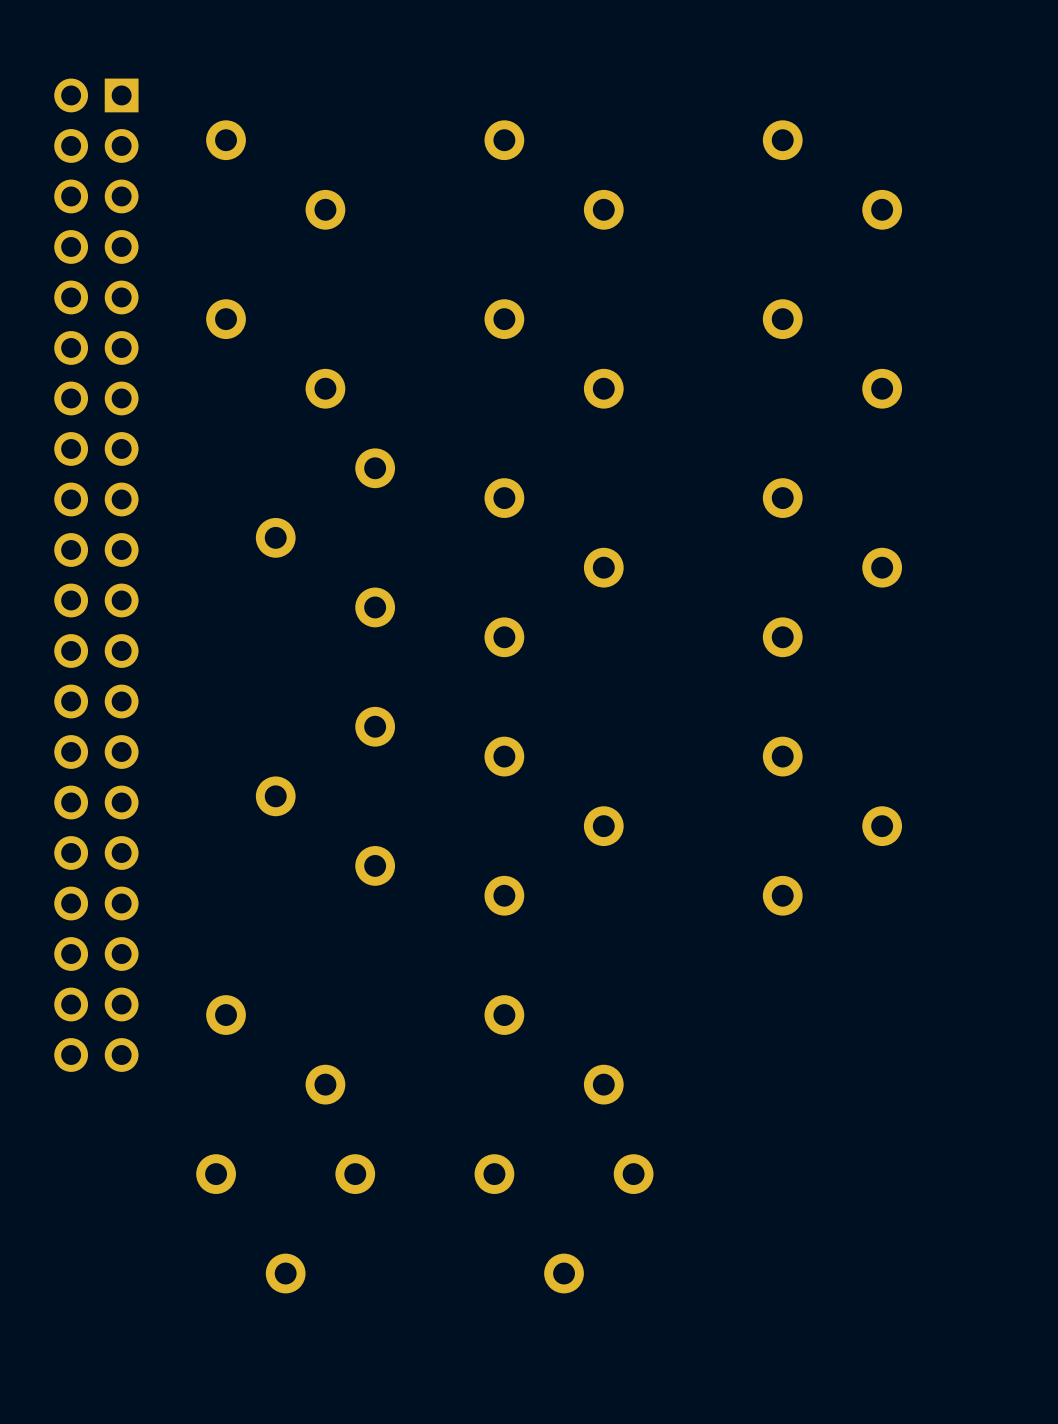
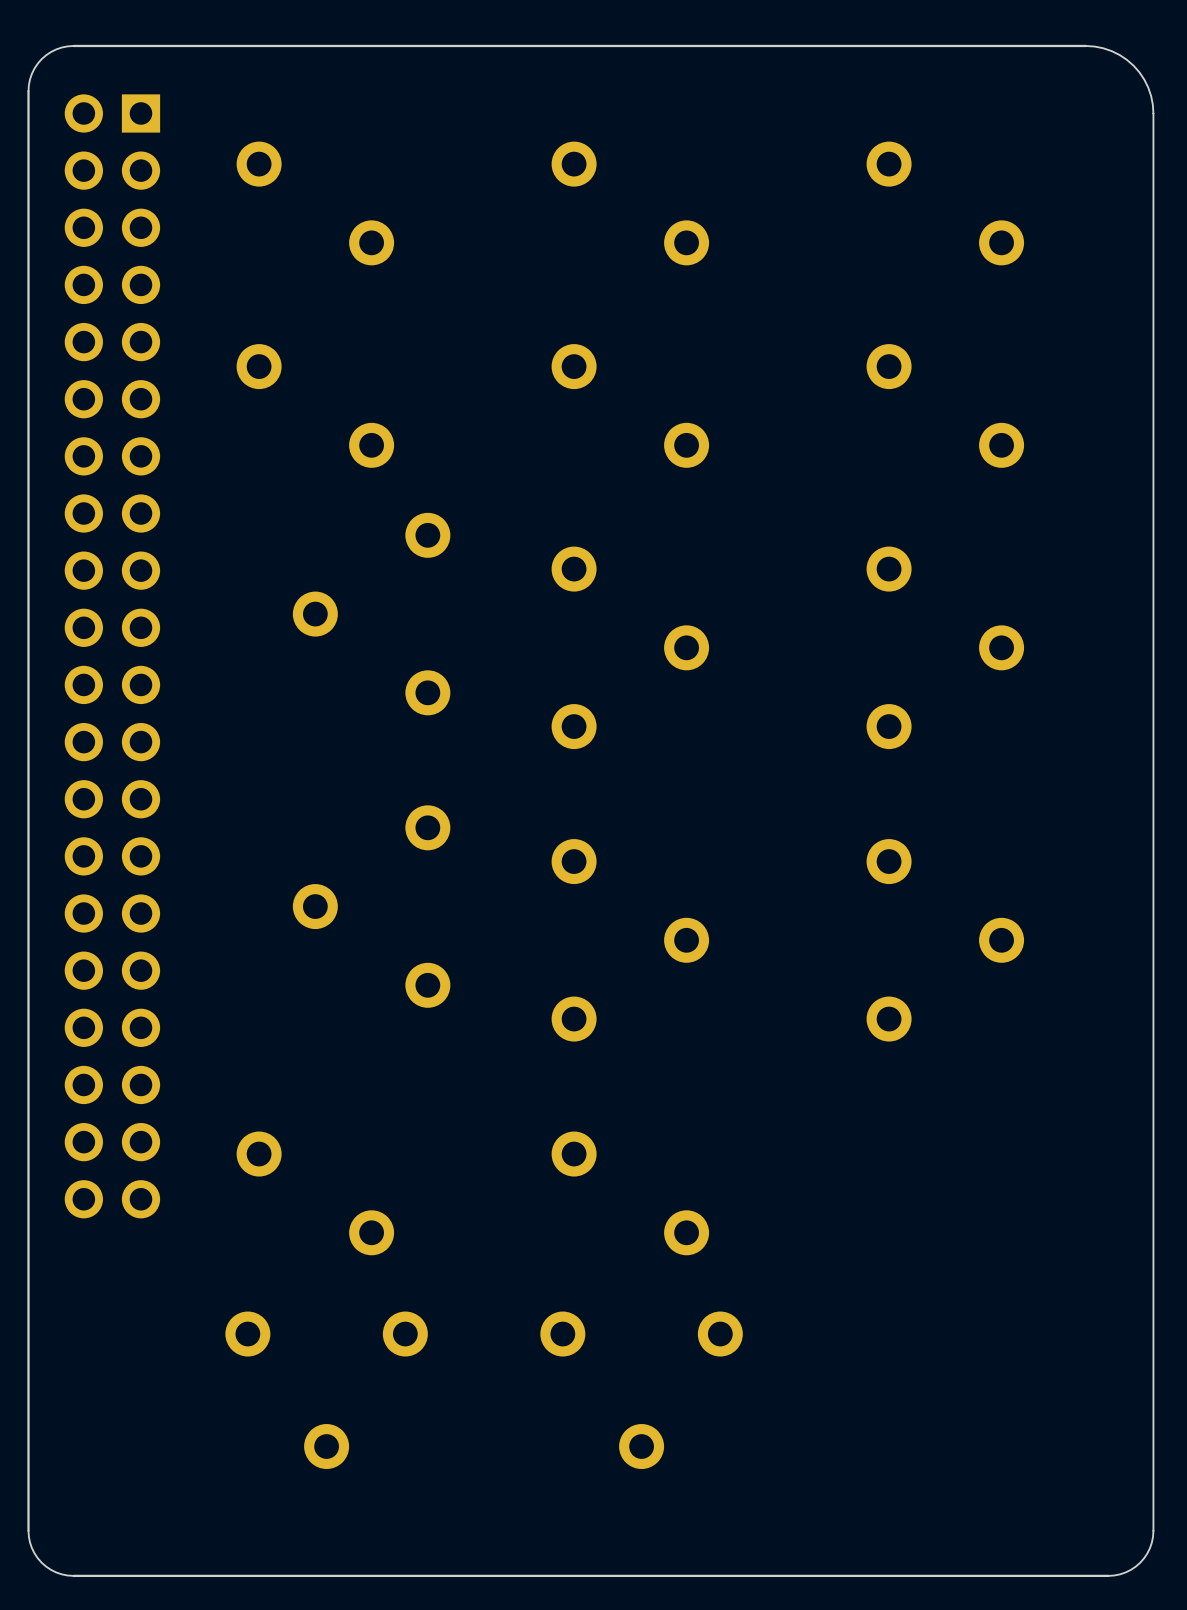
board edge: none -> (1085, 45) (73, 45) (61, 47) (51, 52) (37, 63) (31, 73) (28, 90) (28, 1530) (31, 1548) (37, 1558) (46, 1566) (61, 1574) (73, 1575) (1108, 1575) (1120, 1574) (1130, 1569) (1144, 1558) (1150, 1548) (1153, 1530) (1153, 113) (1148, 87) (1133, 65) (1111, 51) (1085, 45)

